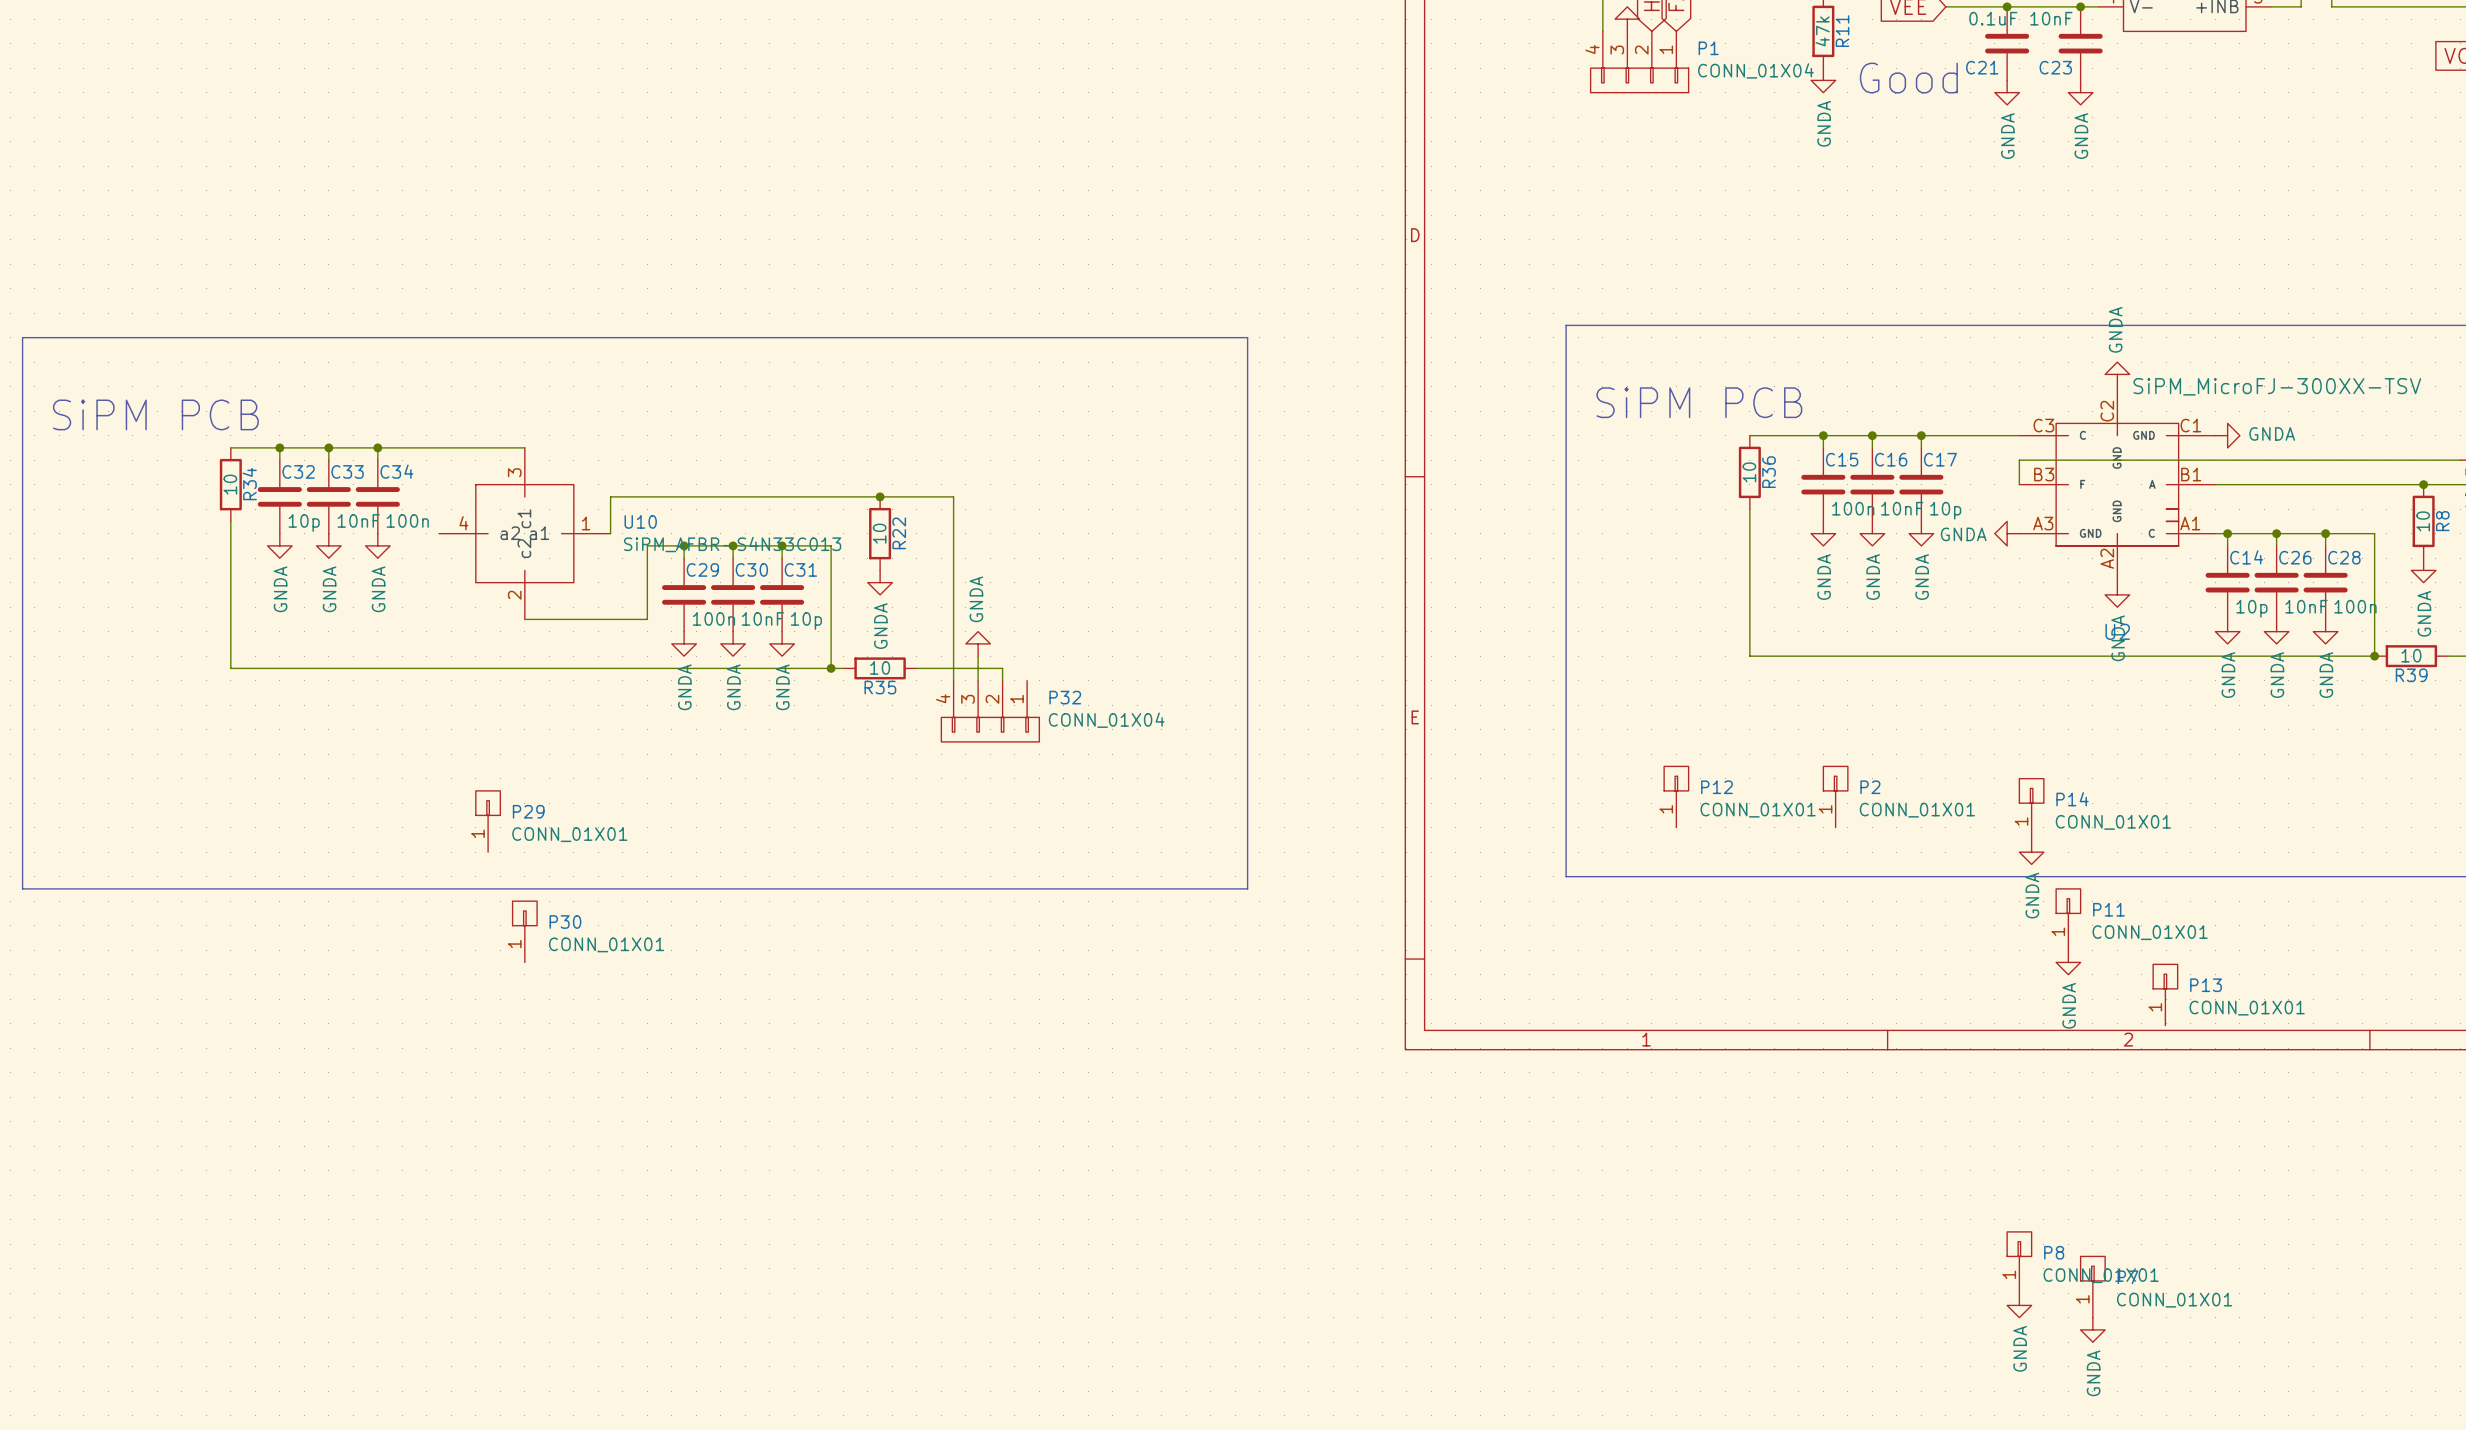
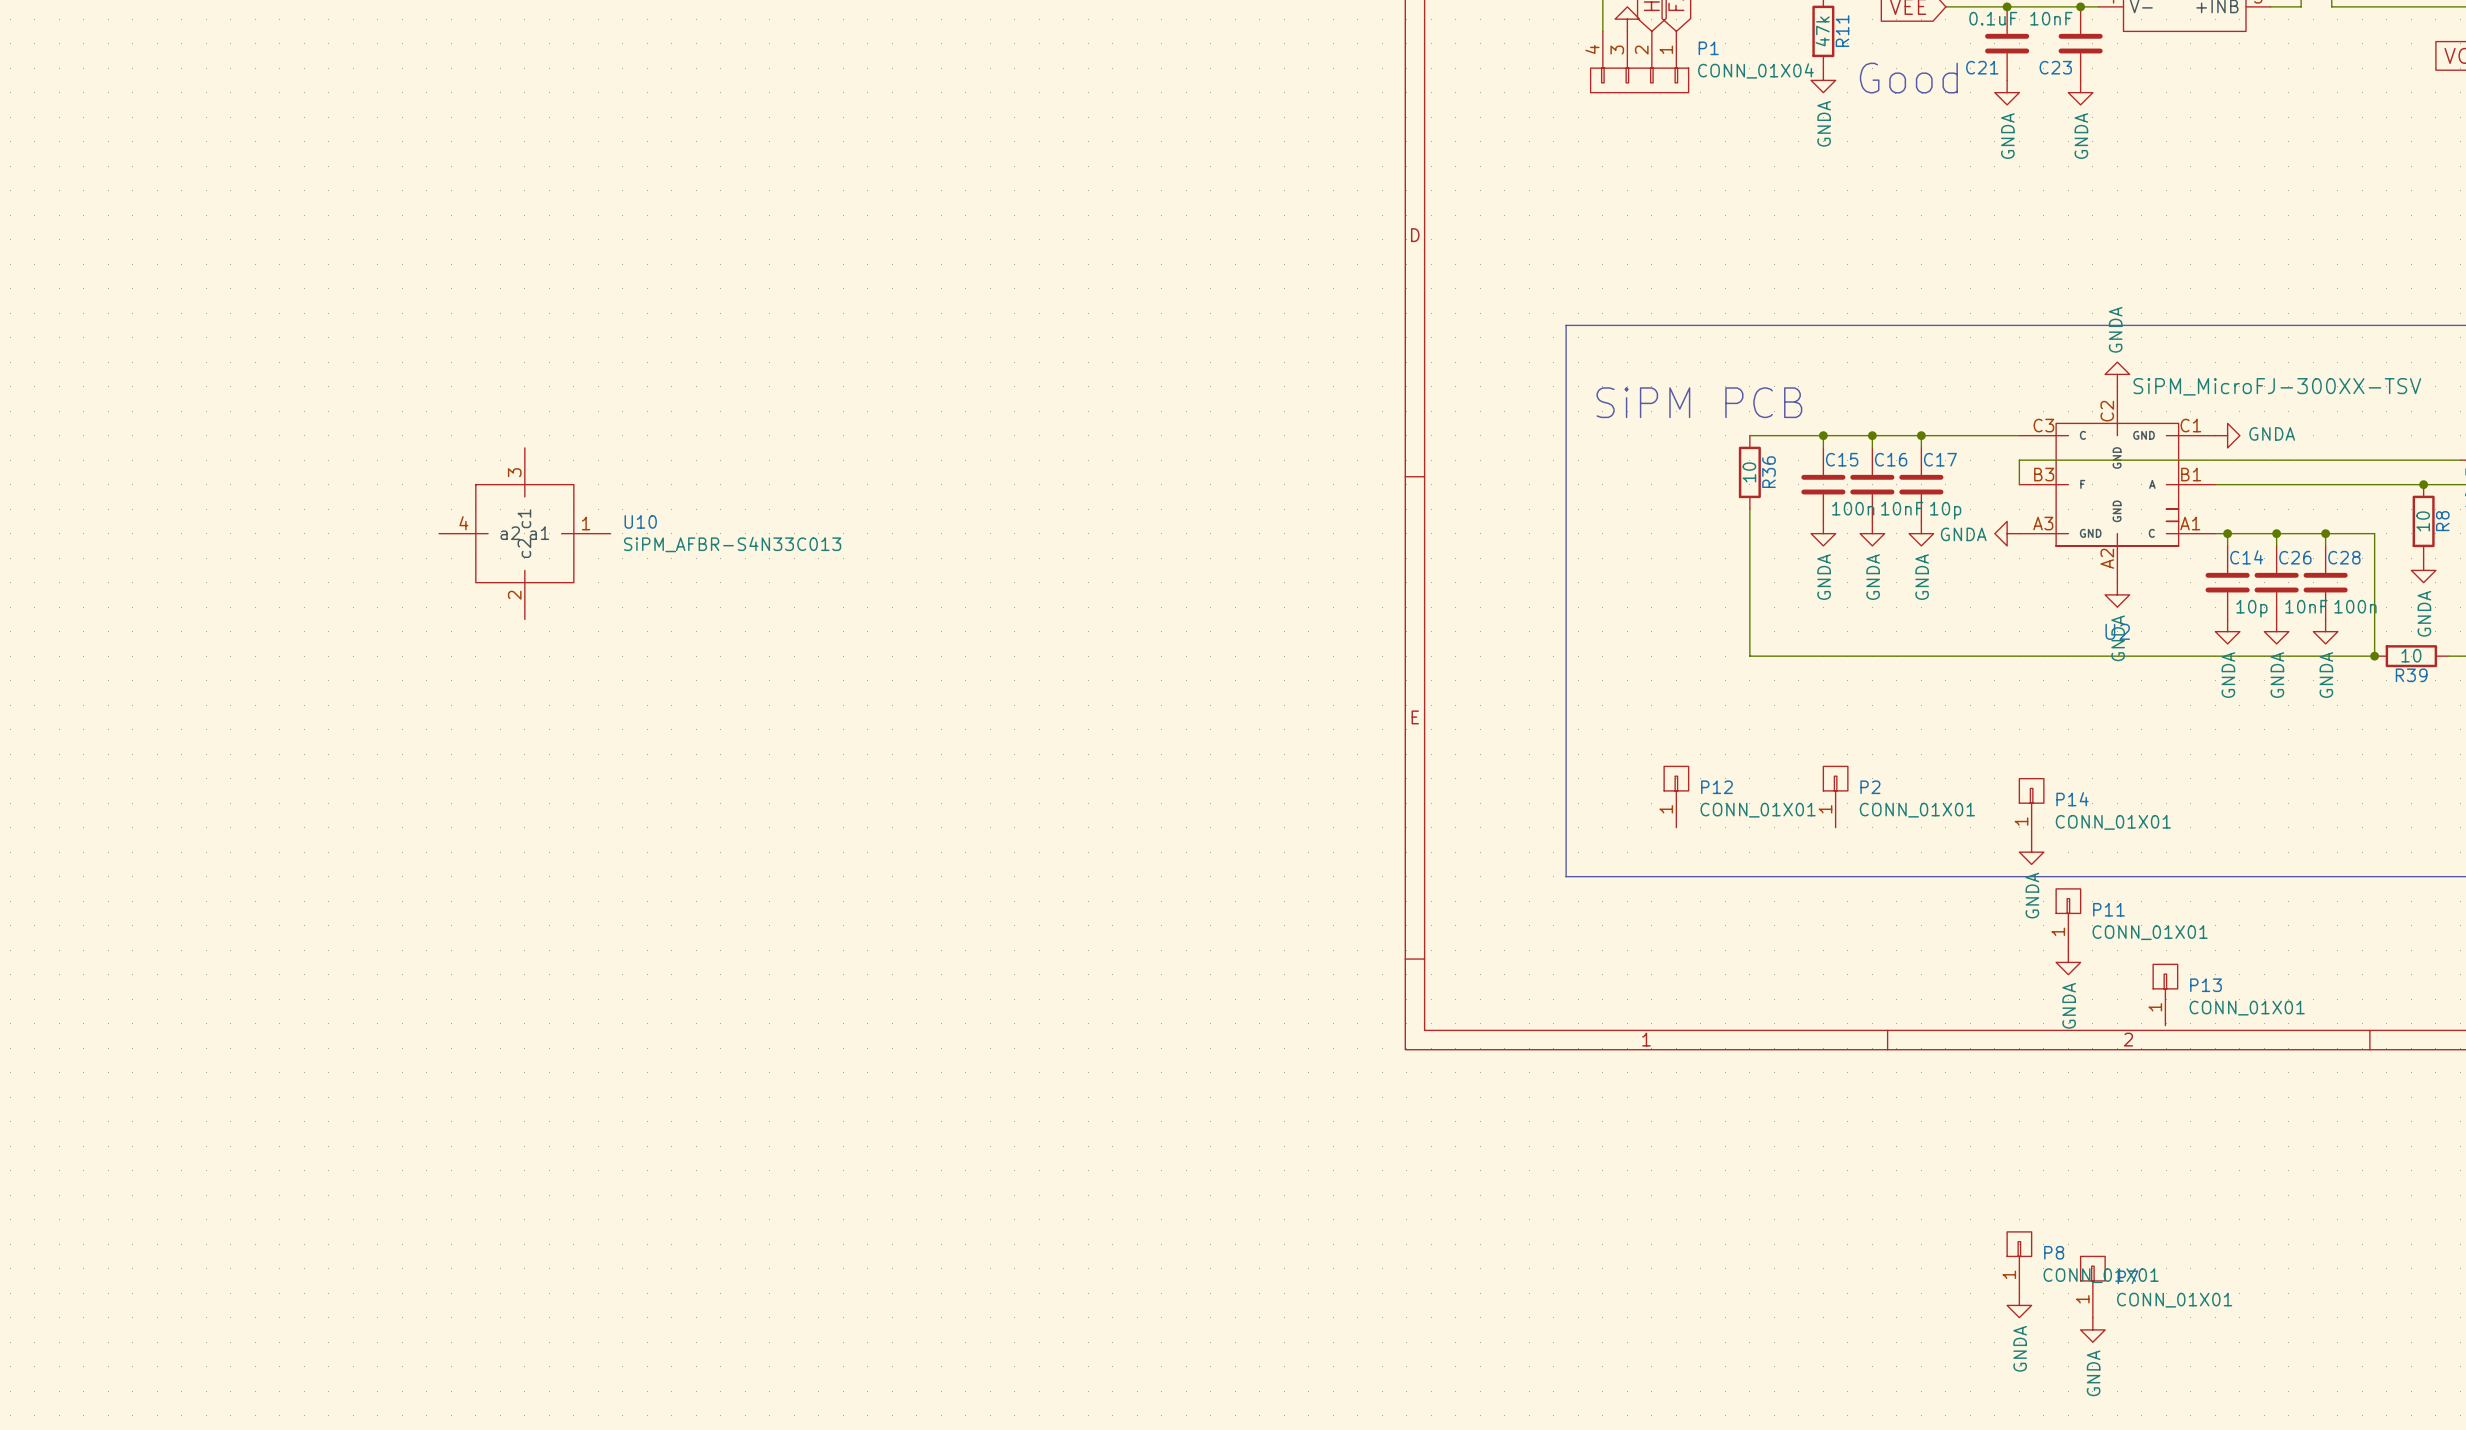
bus: (22, 337) (1247, 337) (1247, 888) (22, 888) (22, 337) -> none
text: SiPM PCB (155, 414) -> none
wire: (230, 447) (524, 447) -> none
wire: (279, 447) (279, 460) -> none
junction: (279, 447) -> none
wire: (328, 447) (328, 460) -> none
junction: (328, 447) -> none
wire: (377, 447) (377, 460) -> none
junction: (377, 447) -> none
R34: 10 (230, 484) -> none
C32: 10p (279, 496) -> none
C33: 10nF (328, 496) -> none
C34: 100n (377, 496) -> none
junction: (880, 496) -> none
wire: (230, 521) (230, 668) (843, 668) -> none
wire: (610, 533) (610, 496) (953, 496) (953, 680) -> none
R22: 10 (880, 533) -> none
power symbol: GNDA (279, 545) -> none
power symbol: GNDA (328, 545) -> none
power symbol: GNDA (377, 545) -> none
wire: (684, 545) (684, 558) -> none
junction: (684, 545) -> none
wire: (733, 545) (733, 558) -> none
junction: (733, 545) -> none
wire: (782, 545) (782, 558) -> none
junction: (782, 545) -> none
power symbol: GNDA (880, 582) -> none
C29: 100n (684, 594) -> none
C30: 10nF (733, 594) -> none
C31: 10p (782, 594) -> none
wire: (524, 619) (647, 619) (647, 545) (831, 545) (831, 668) -> none
power symbol: GNDA (684, 643) -> none
power symbol: GNDA (733, 643) -> none
power symbol: GNDA (782, 643) -> none
power symbol: GNDA (978, 643) -> none
wire: (978, 656) (978, 680) -> none
junction: (831, 668) -> none
R35: 10 (880, 668) -> none
wire: (916, 668) (1002, 668) (1002, 680) -> none
P32: CONN_01X04 (990, 711) -> none
P29: CONN_01X01 (488, 821) -> none
P30: CONN_01X01 (524, 931) -> none

